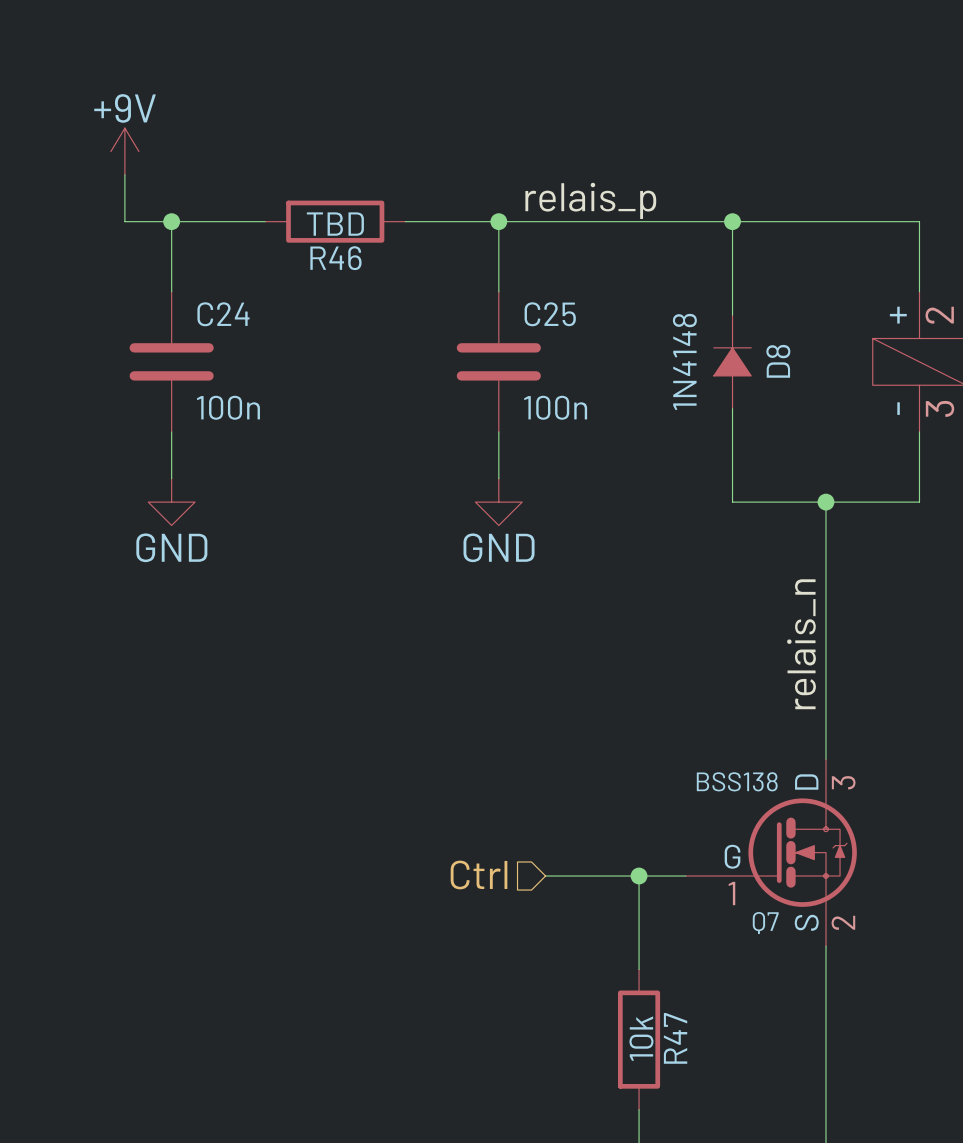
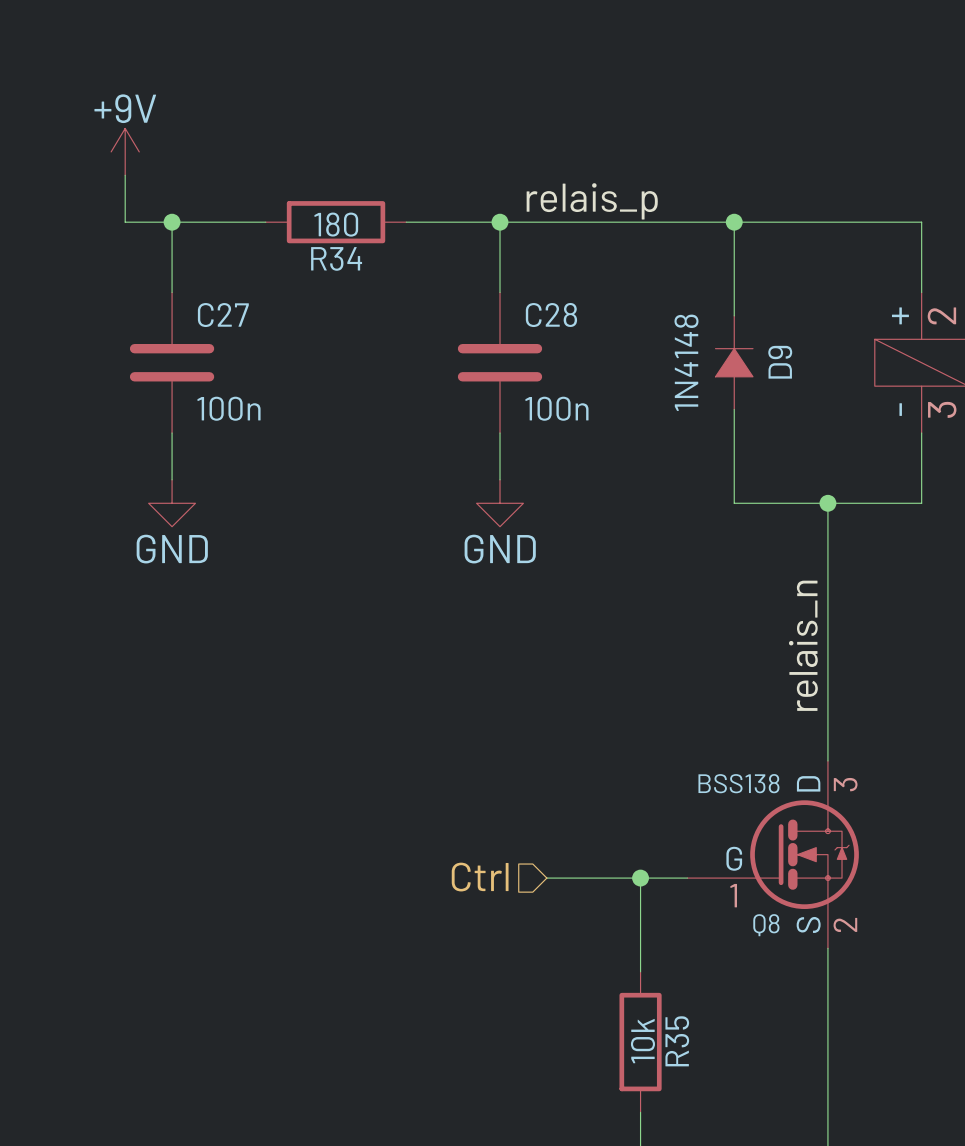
R46 value: TBD (335, 224) -> 180 (336, 224)
R46 name: R46 (335, 258) -> R34 (336, 258)
C24 name: C24 (223, 314) -> C27 (223, 315)
C25 name: C25 (550, 314) -> C28 (551, 314)
D8 name: D8 (778, 361) -> D9 (780, 362)
Q7 name: Q7 (765, 923) -> Q8 (766, 925)
R47 name: R47 (675, 1038) -> R35 (677, 1041)

